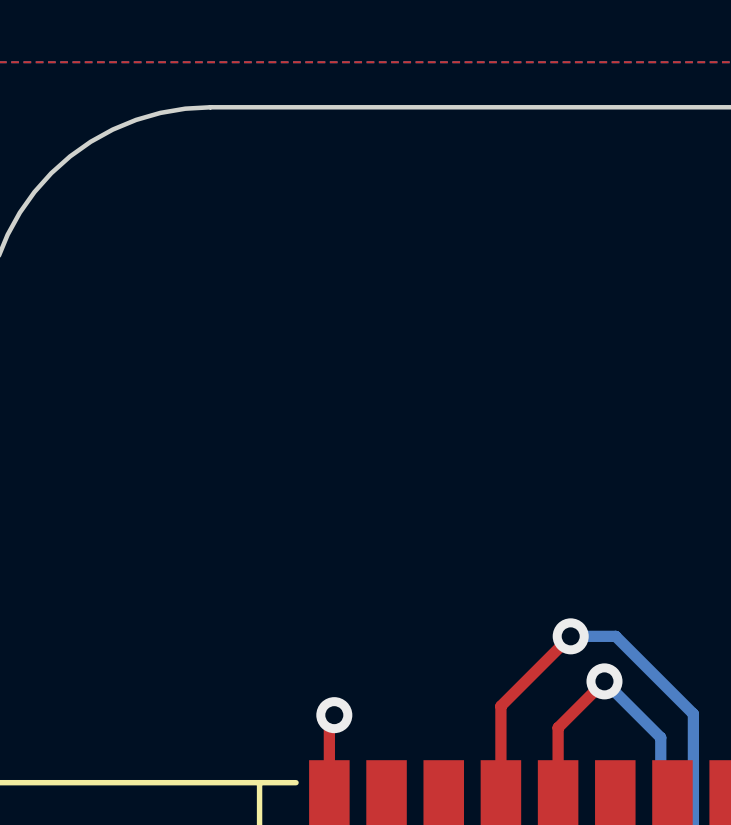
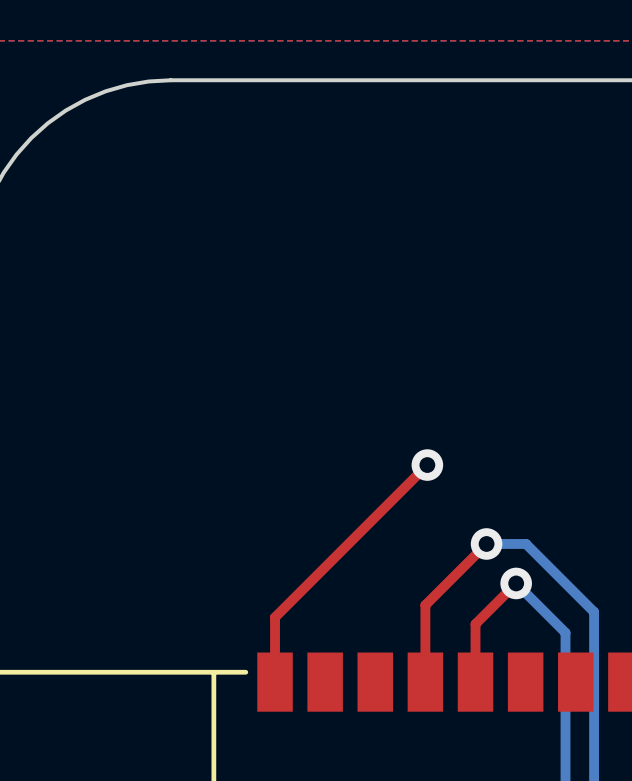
top track: none -> (427, 465) (279, 613)
via position: (334, 715) -> (427, 465)

